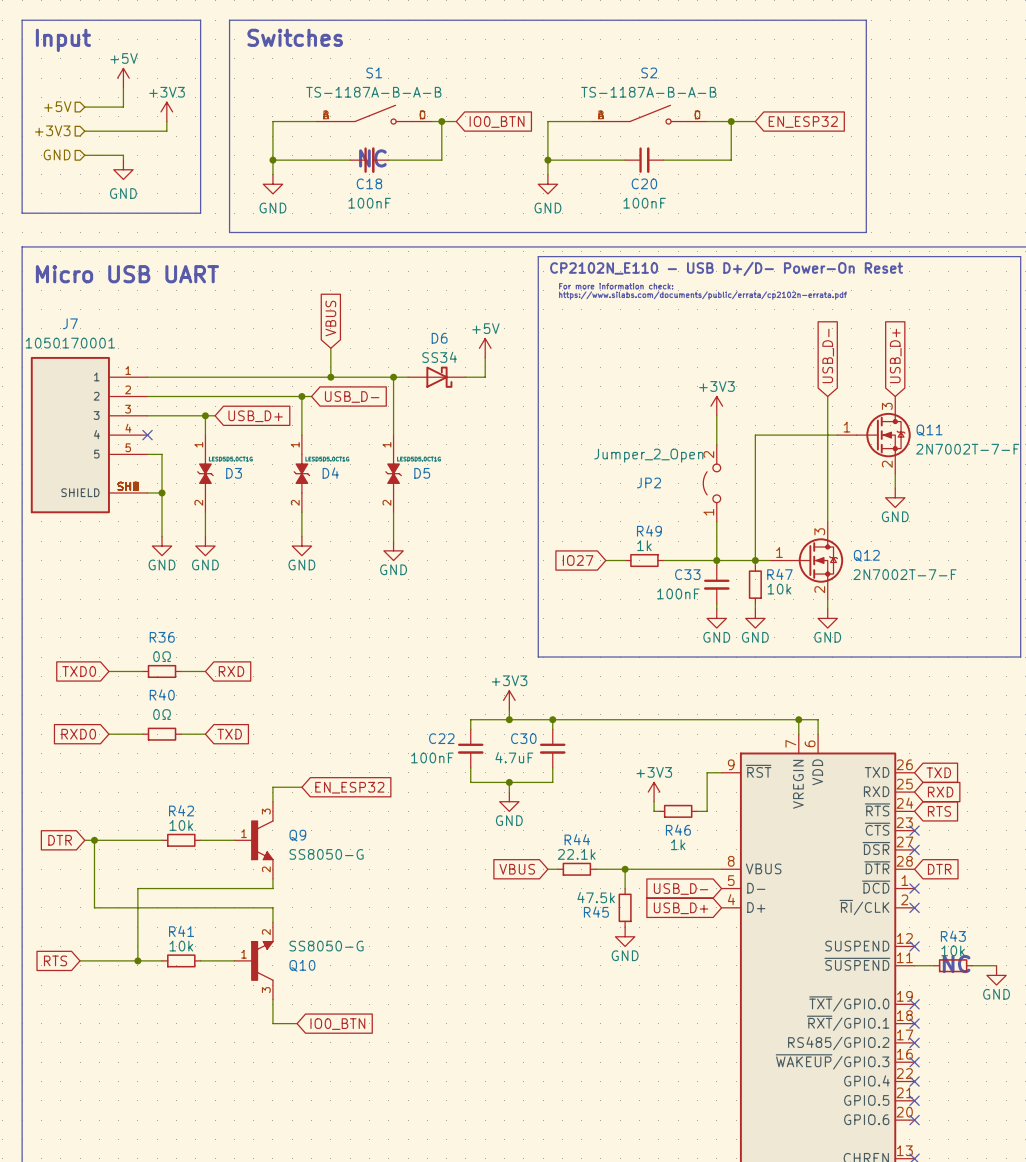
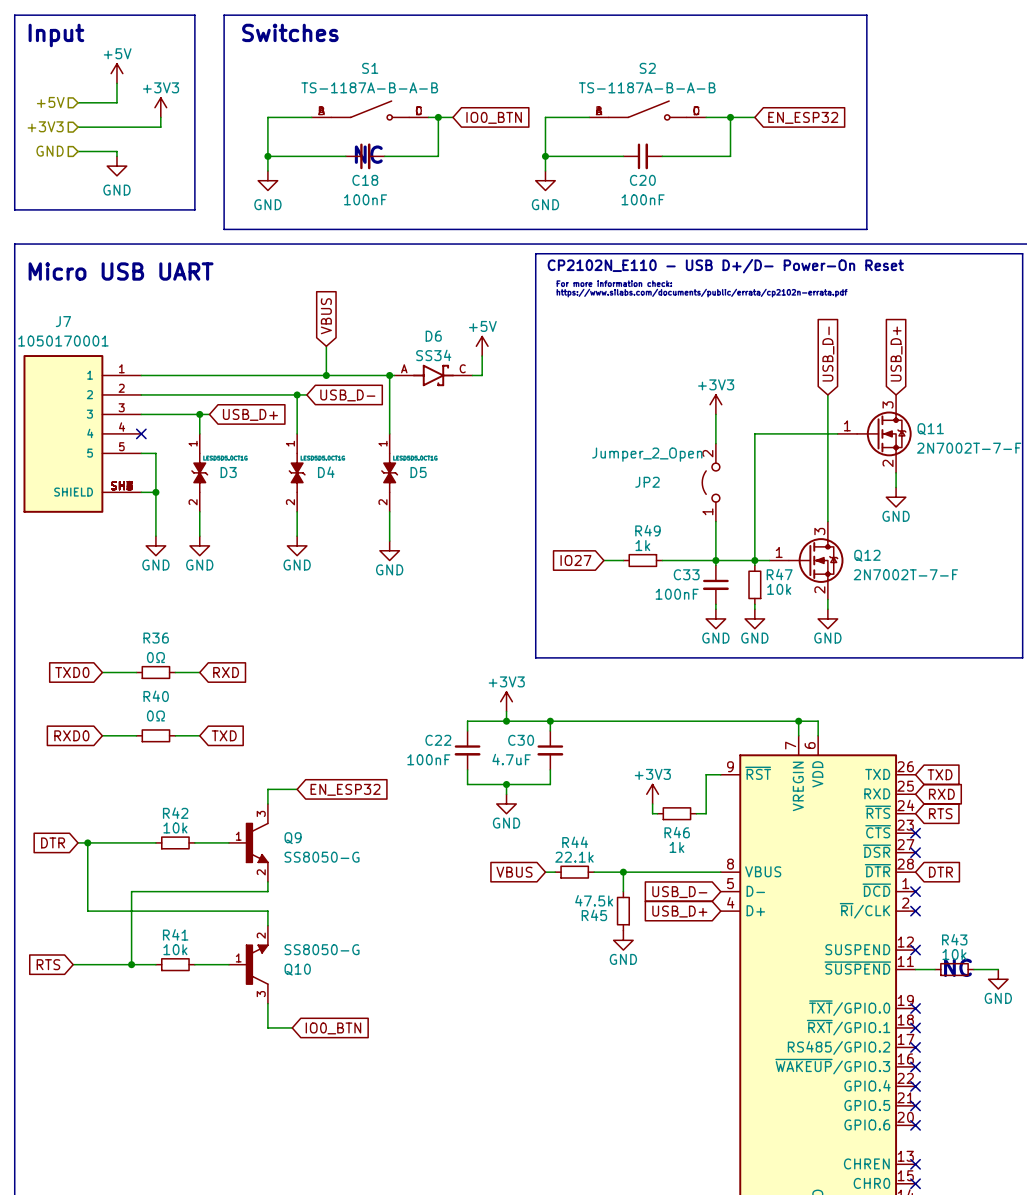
D6 symbol: [408, 366, 466, 388] -> [394, 364, 473, 387]

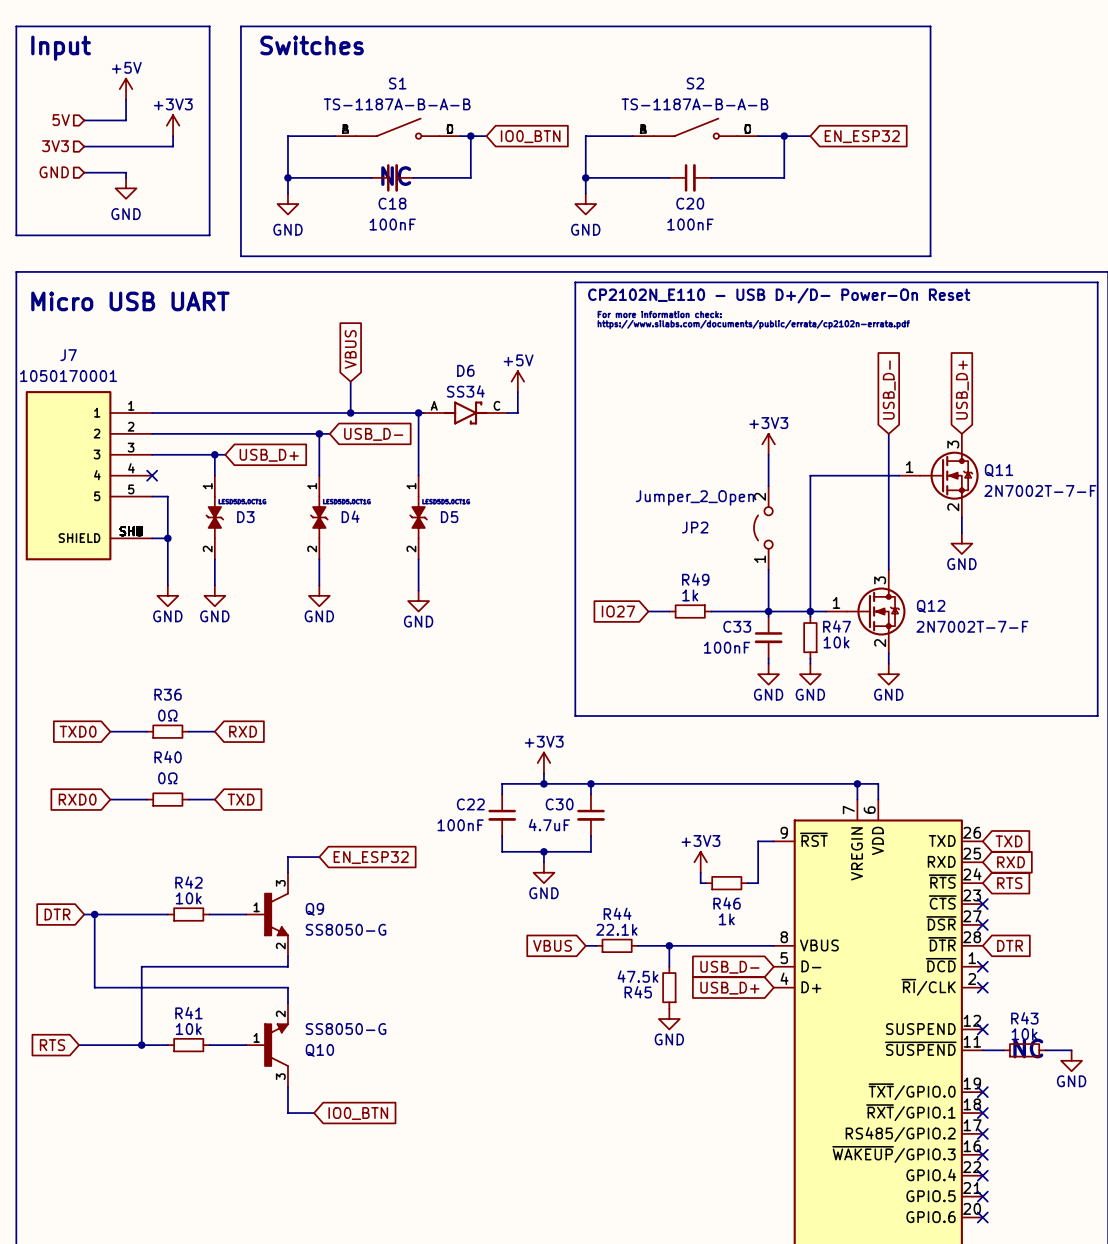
hierarchical label: +5V (50, 102) -> 5V (61, 120)
hierarchical label: +3V3 (45, 126) -> 3V3 (55, 146)

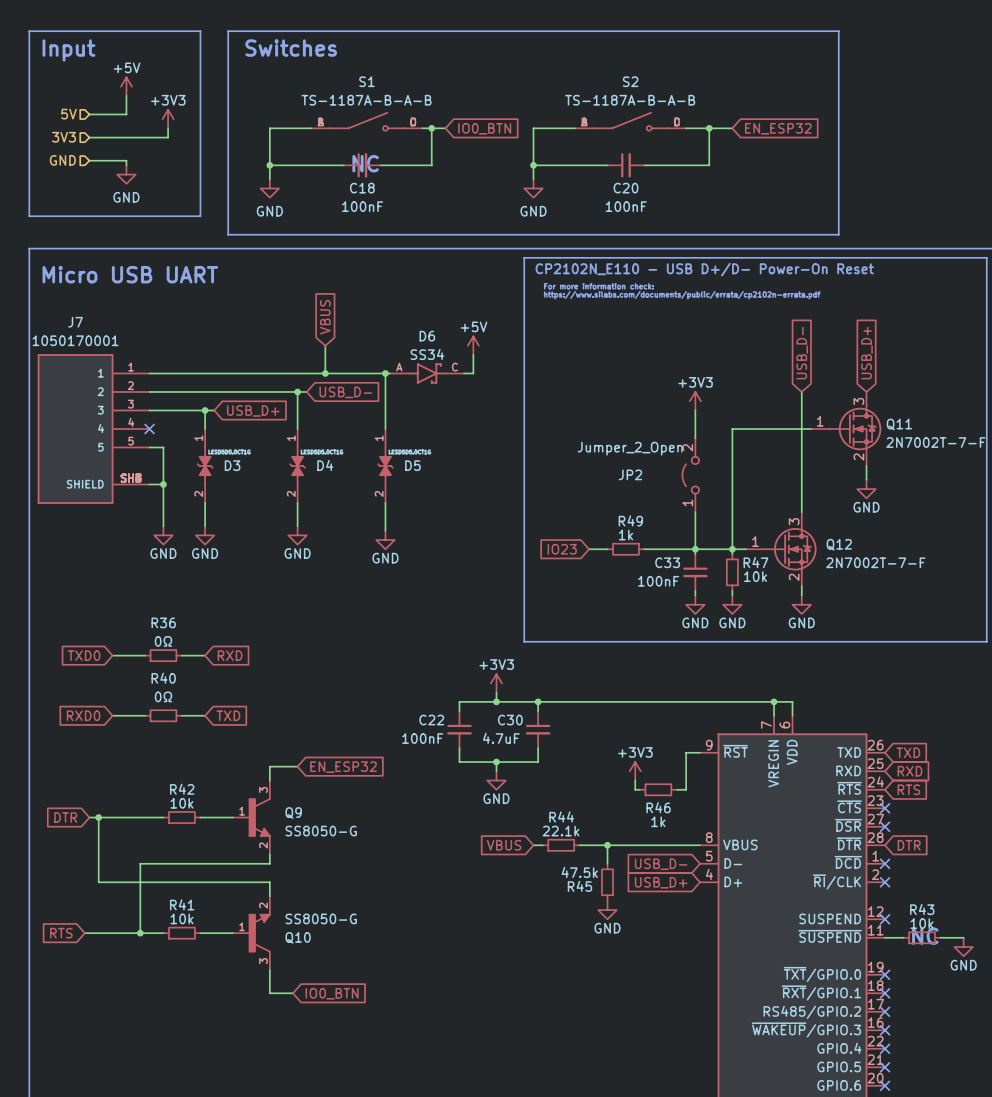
global label: IO27 (618, 611) -> IO23 (562, 549)

